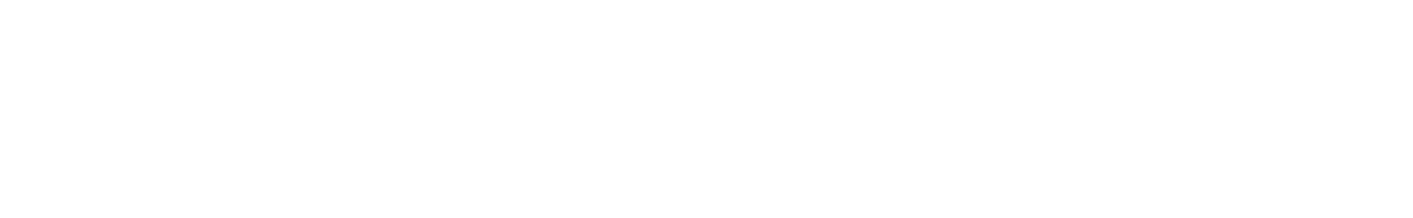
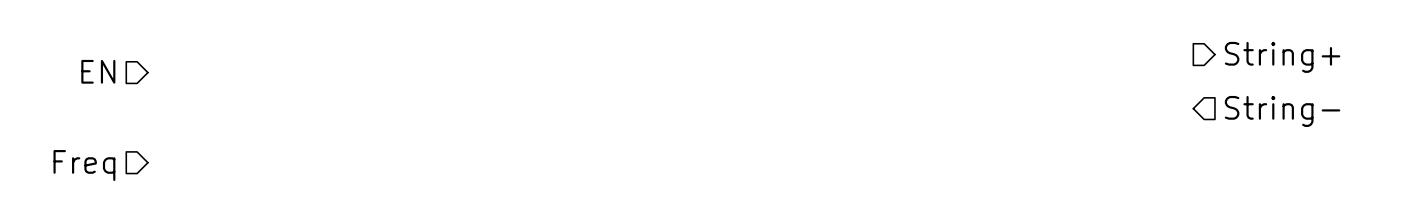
hierarchical label: none -> String+ (1282, 57)
hierarchical label: none -> EN (98, 71)
hierarchical label: none -> String- (1282, 111)
hierarchical label: none -> Freq (84, 165)

